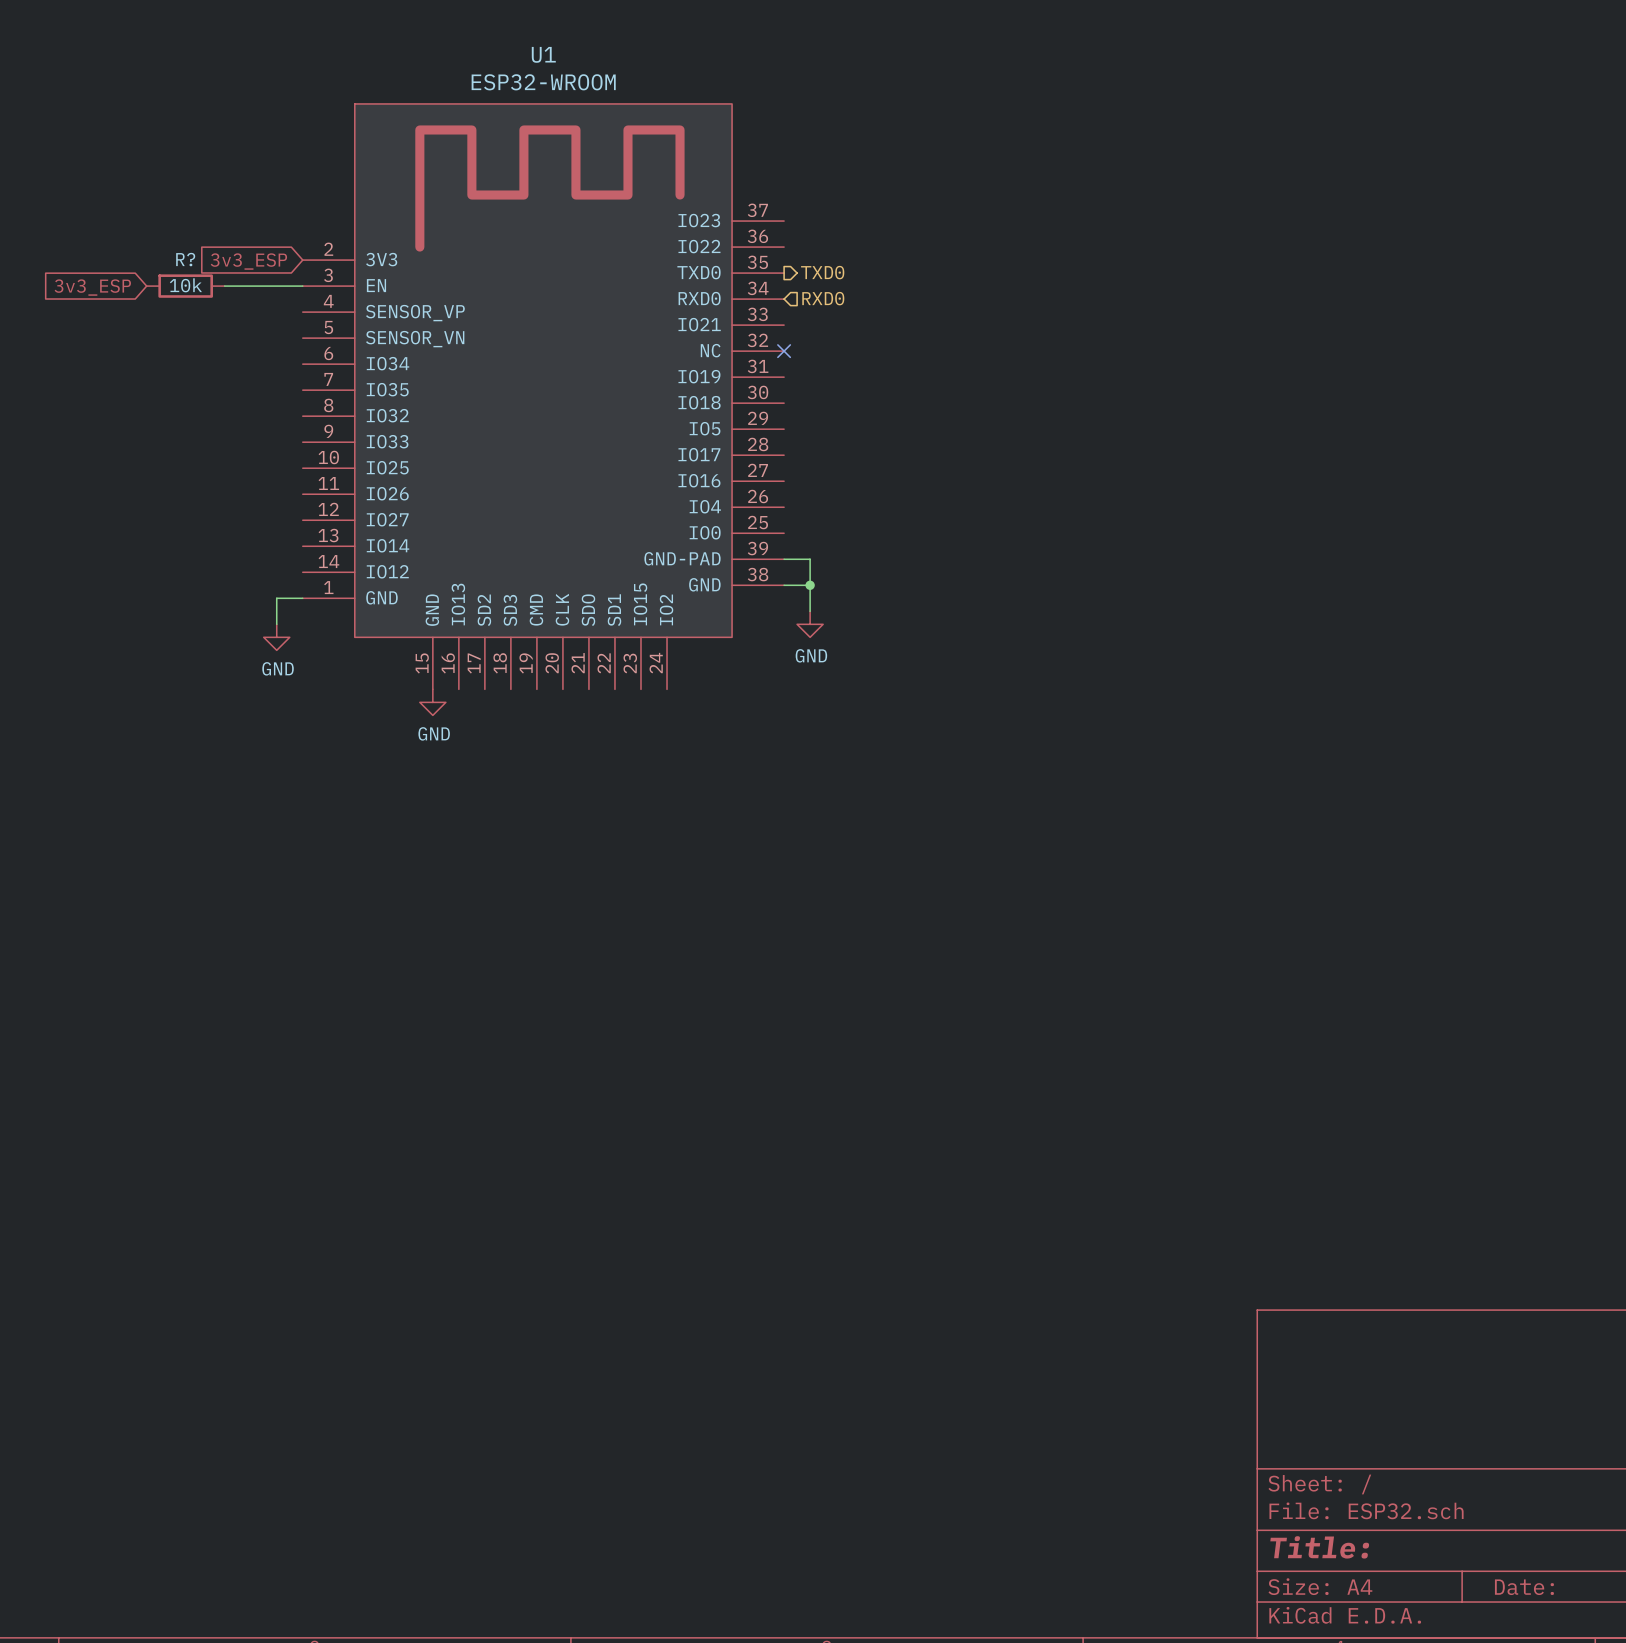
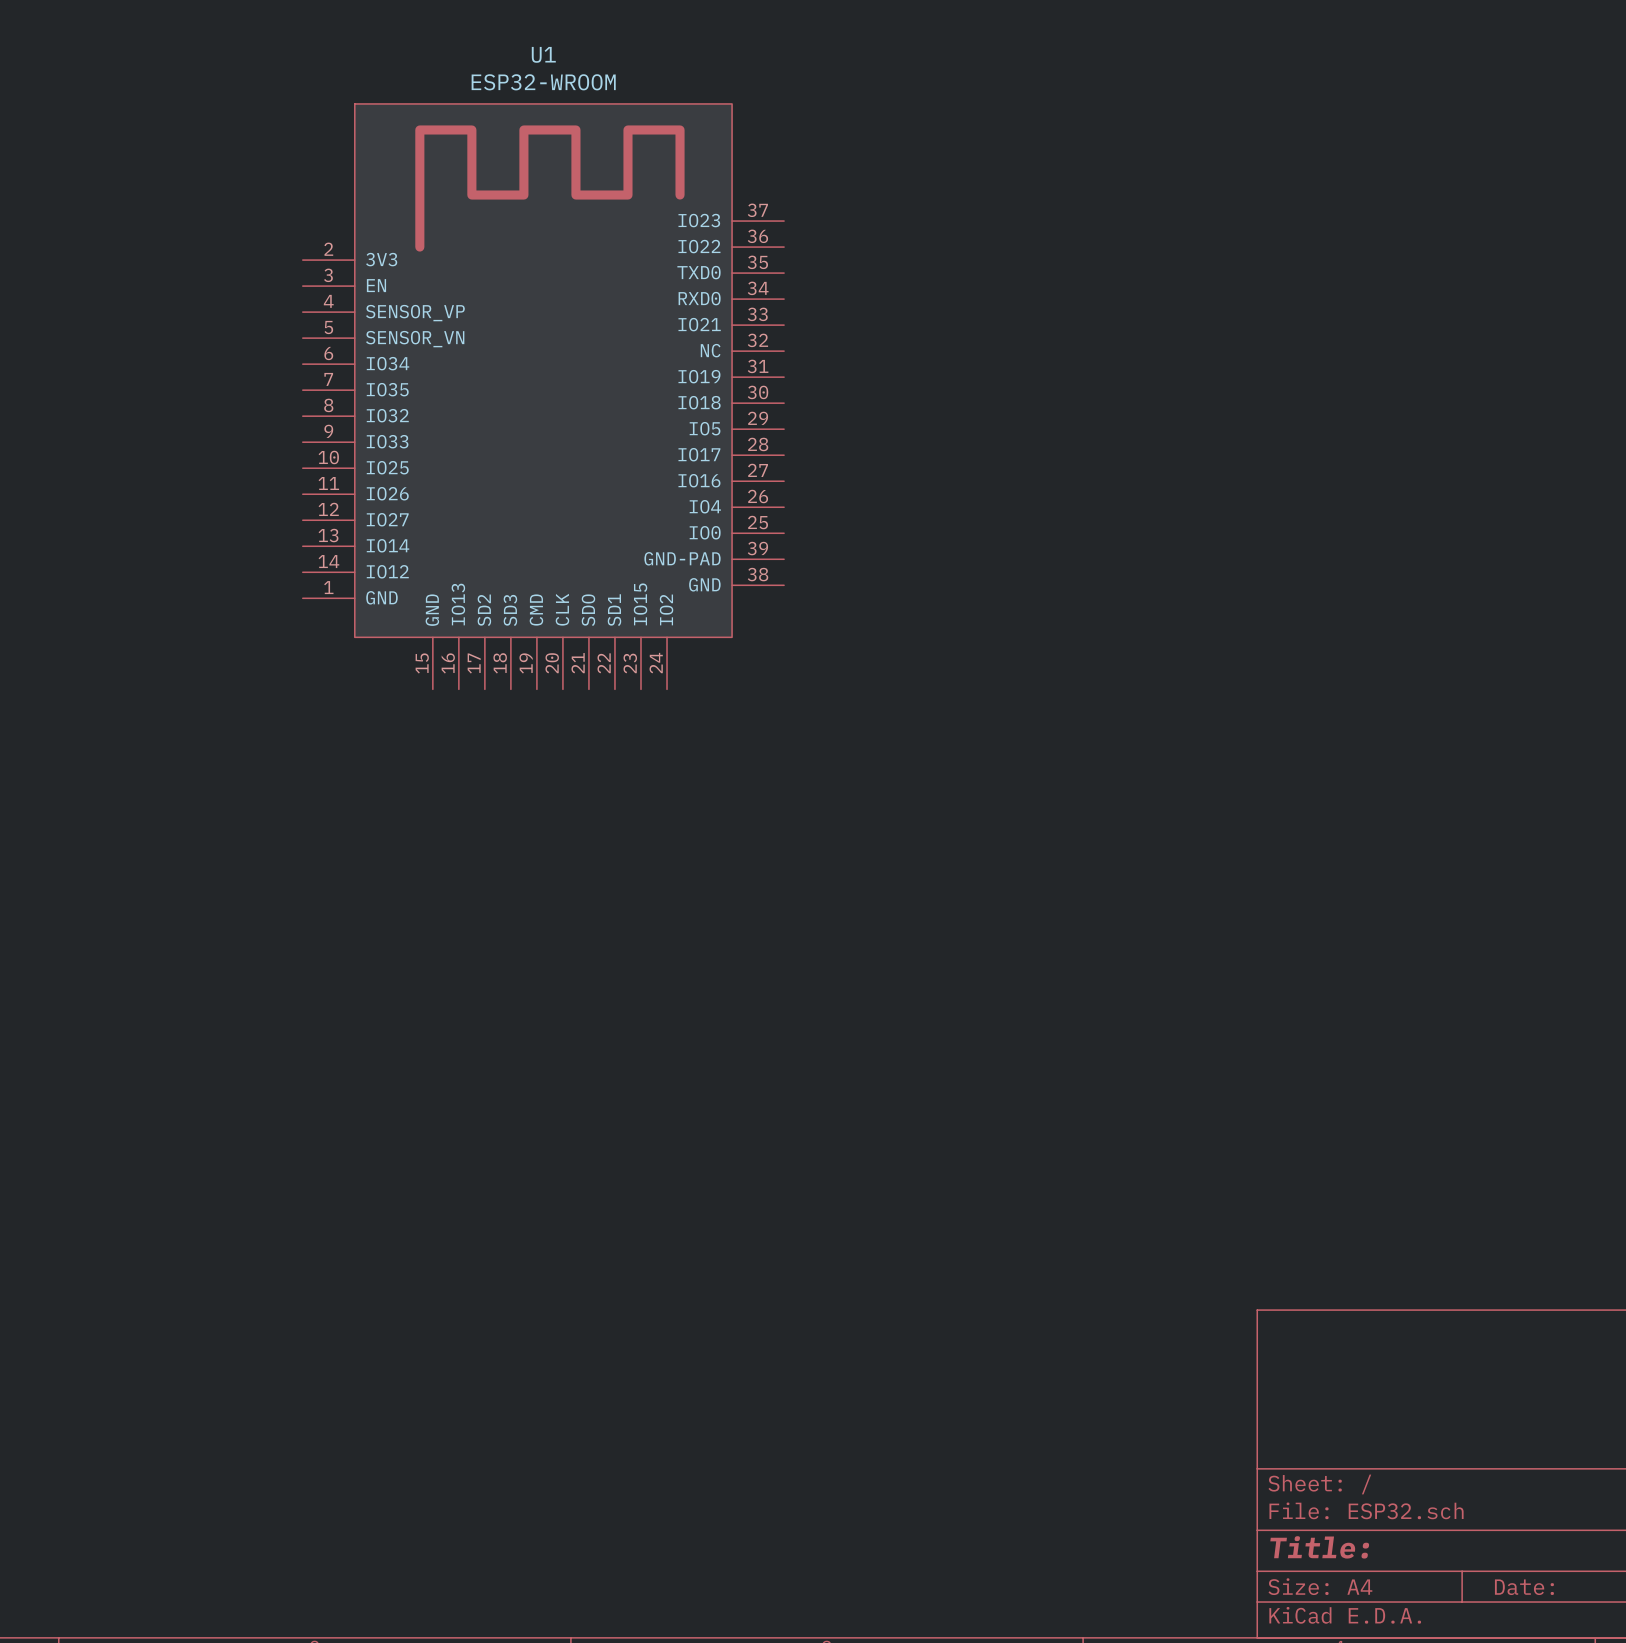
global label: 3v3_ESP (248, 261) -> none
hierarchical label: TXD0 (822, 272) -> none
R?: 10k (185, 286) -> none
wire: (224, 286) (302, 286) -> none
global label: 3v3_ESP (92, 287) -> none
hierarchical label: RXD0 (823, 298) -> none
no-connect mark: (784, 351) -> none
wire: (784, 559) (810, 559) (810, 611) -> none
wire: (784, 585) (810, 585) -> none
junction: (810, 585) -> none
wire: (302, 598) (276, 598) (276, 624) -> none
power symbol: GND (810, 624) -> none
power symbol: GND (276, 637) -> none
power symbol: GND (432, 702) -> none

